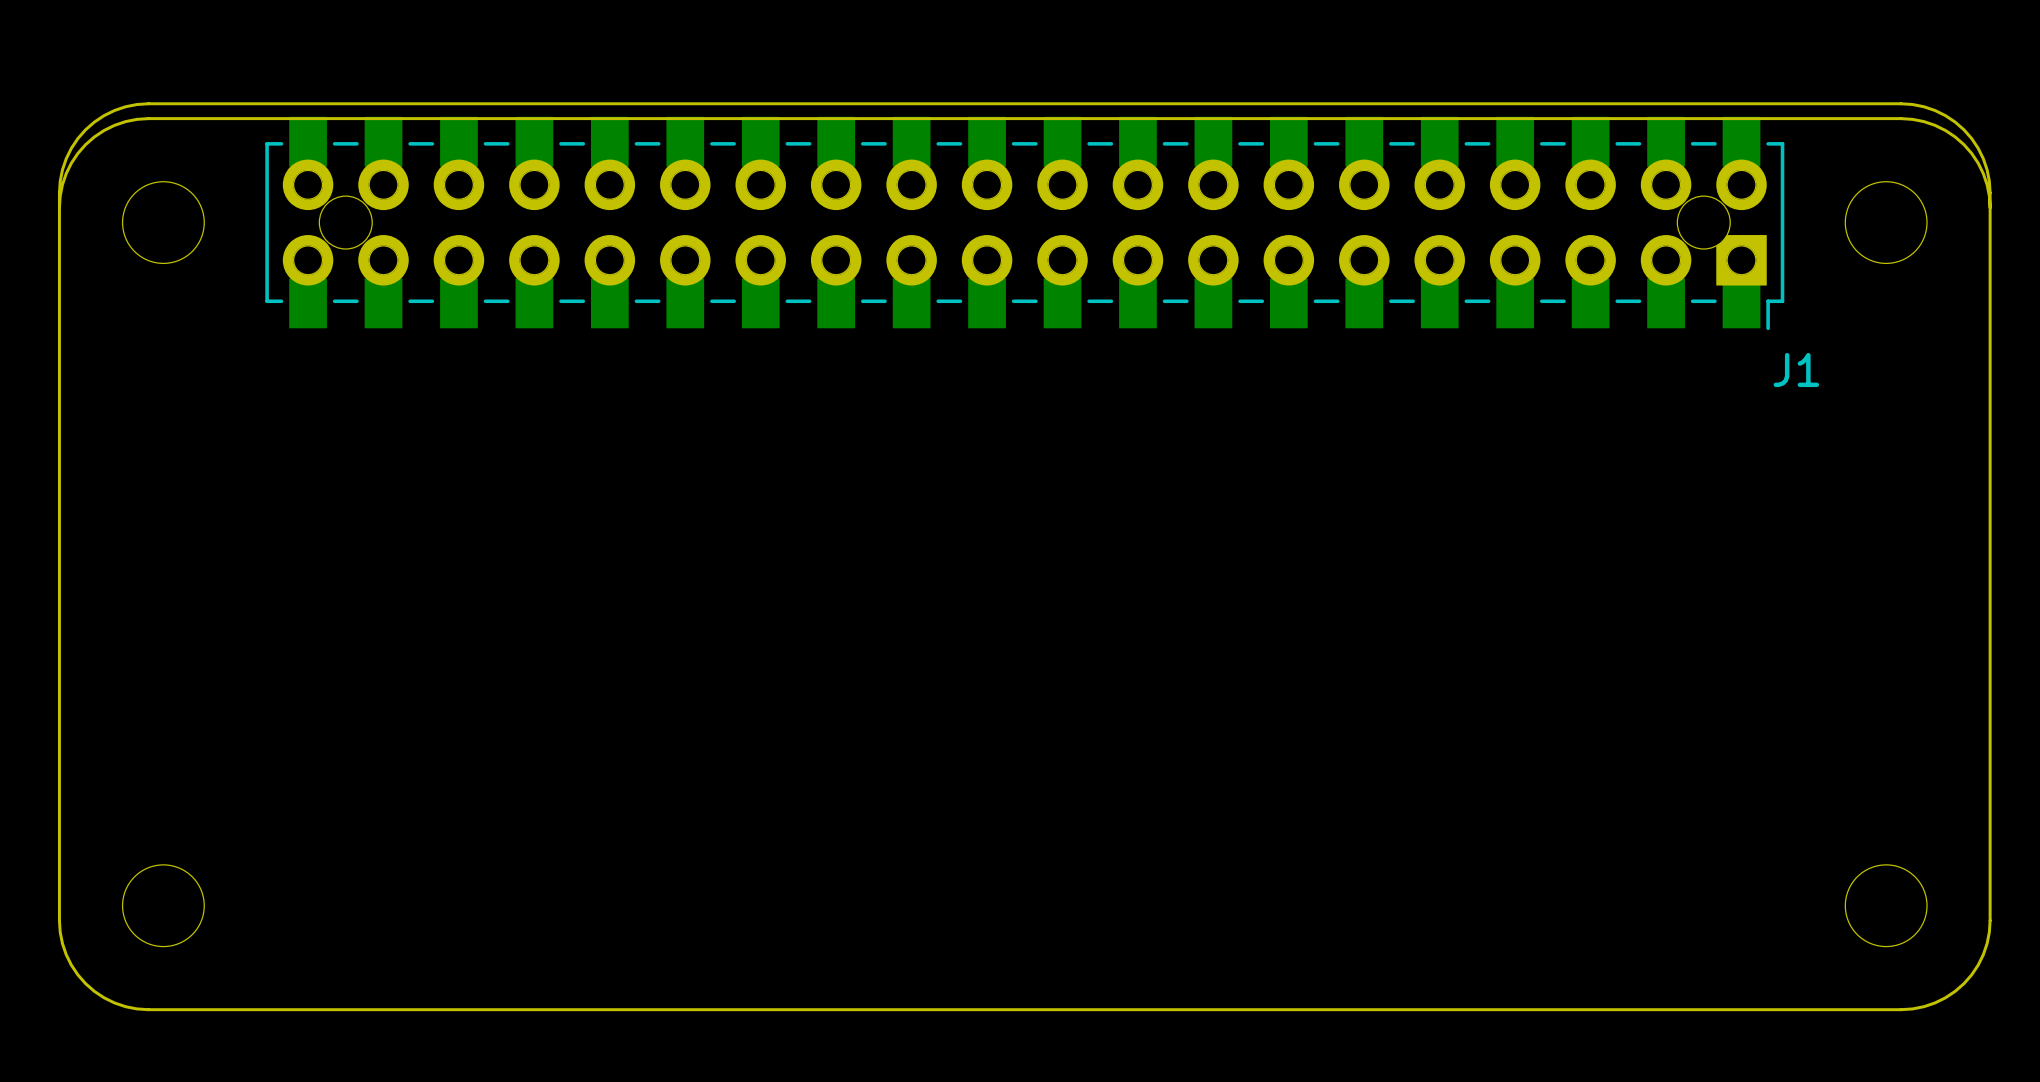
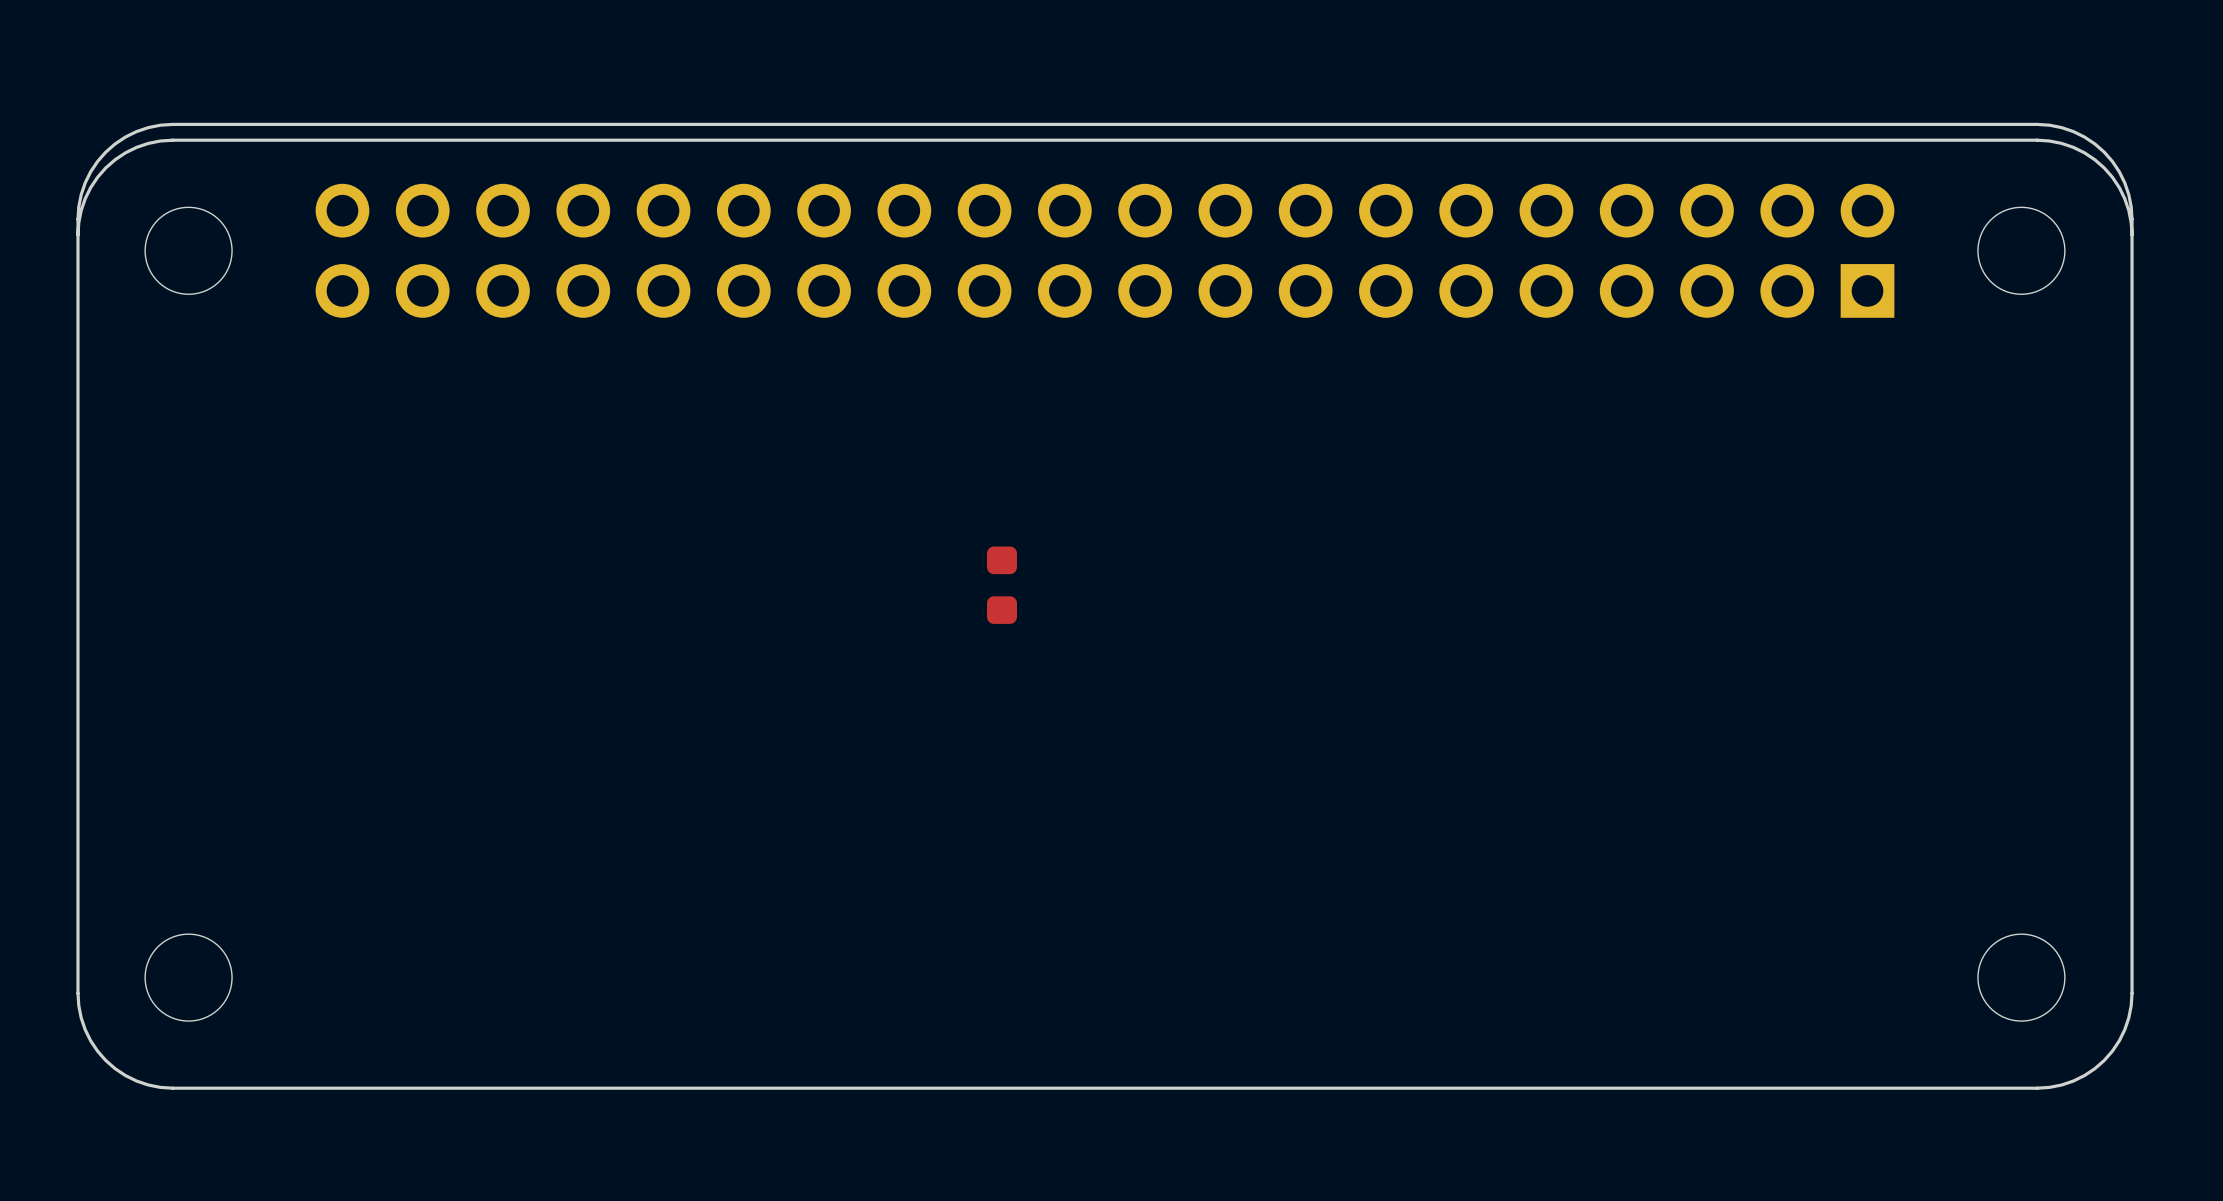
J1: (1024, 223) -> none
part: none -> (1001, 585)

